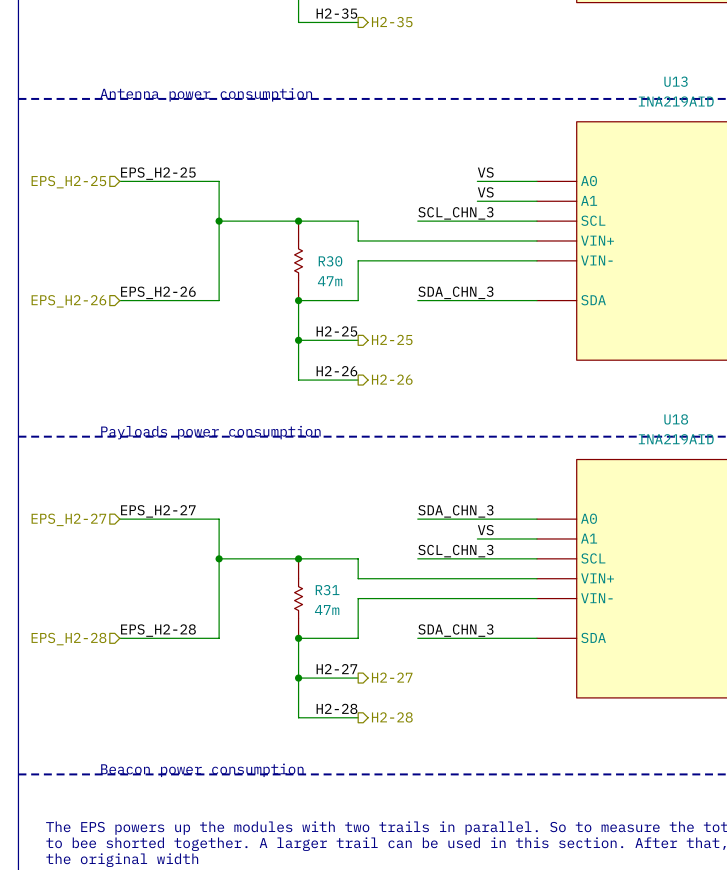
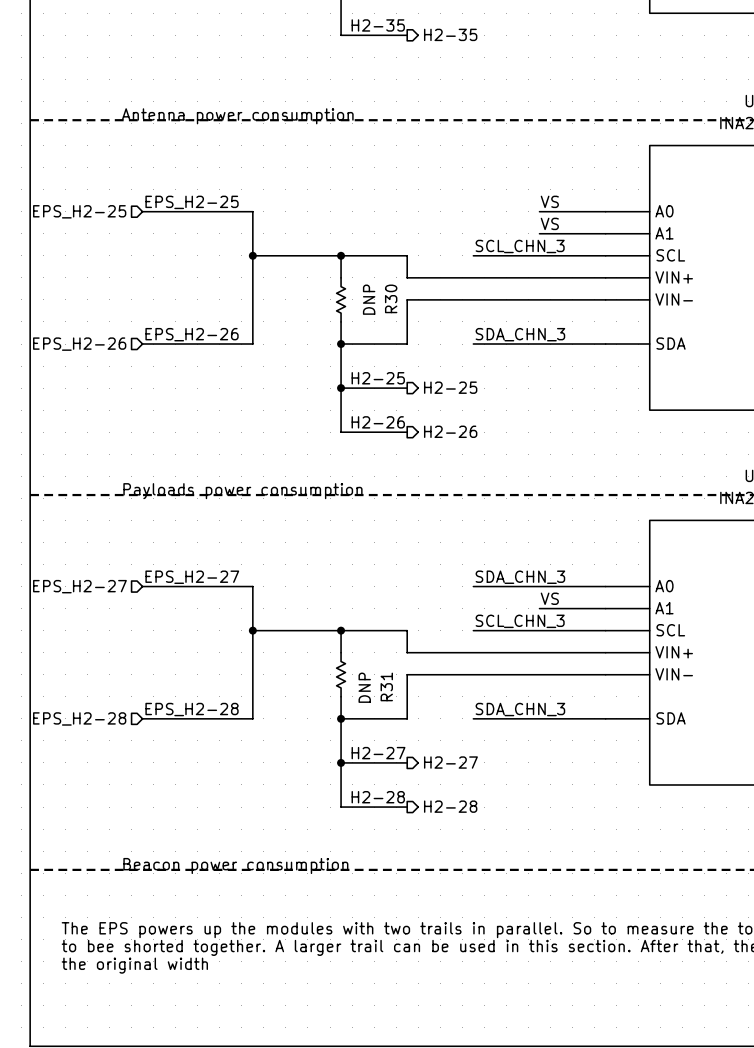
R30 name rotation: 0° (330, 261) -> 90° counterclockwise (391, 298)
R30 value: 47m (330, 281) -> DNP (369, 299)
R31 name rotation: 0° (327, 590) -> 90° counterclockwise (386, 686)
R31 value: 47m (327, 609) -> DNP (364, 687)

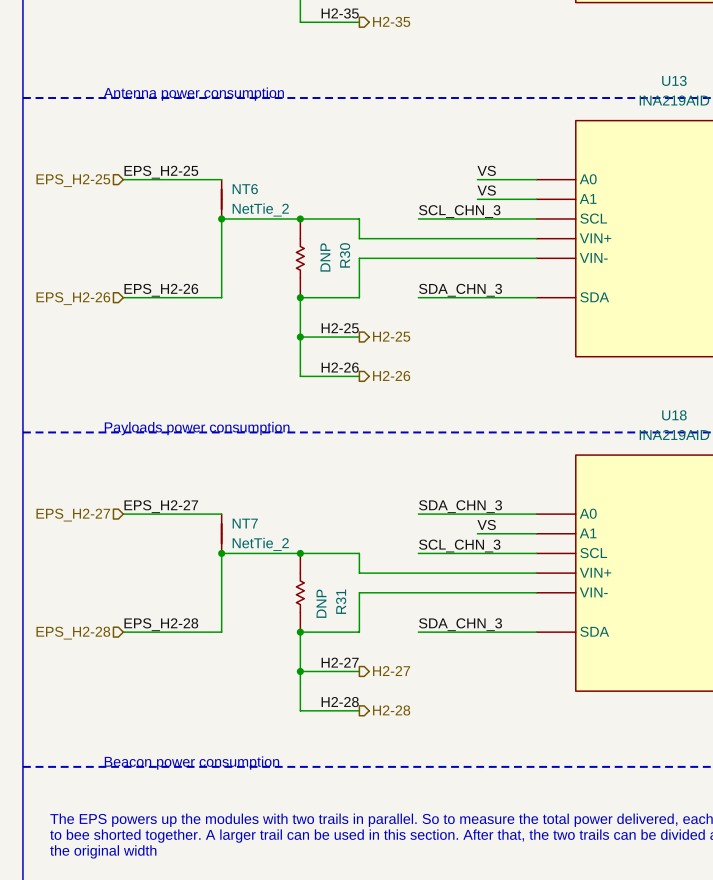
NT6: none -> NetTie_2 (221, 199)
NT7: none -> NetTie_2 (221, 533)

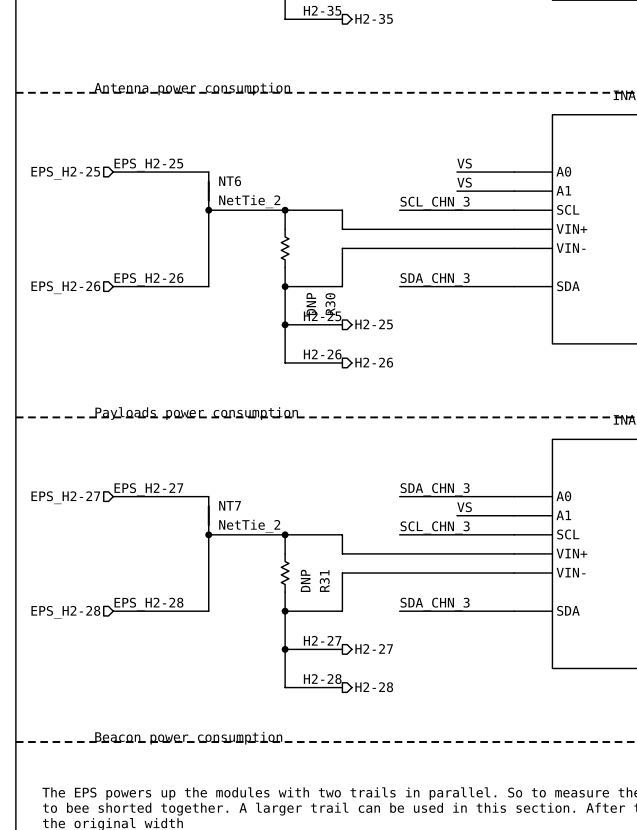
R30 name position: R30 (345, 255) -> R30 (330, 304)
R30 value position: DNP (325, 257) -> DNP (311, 304)

